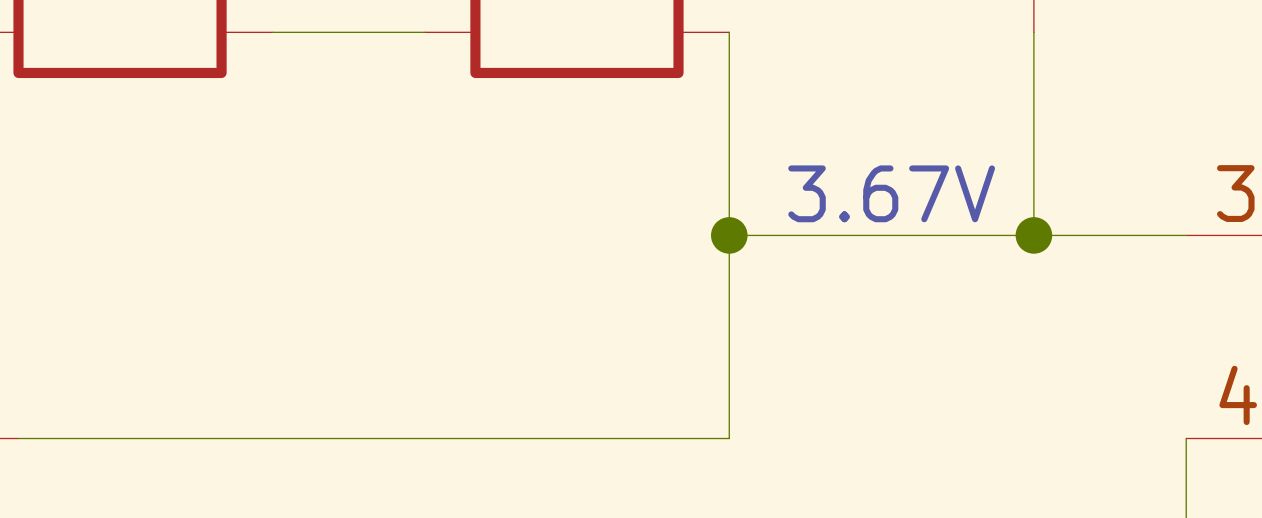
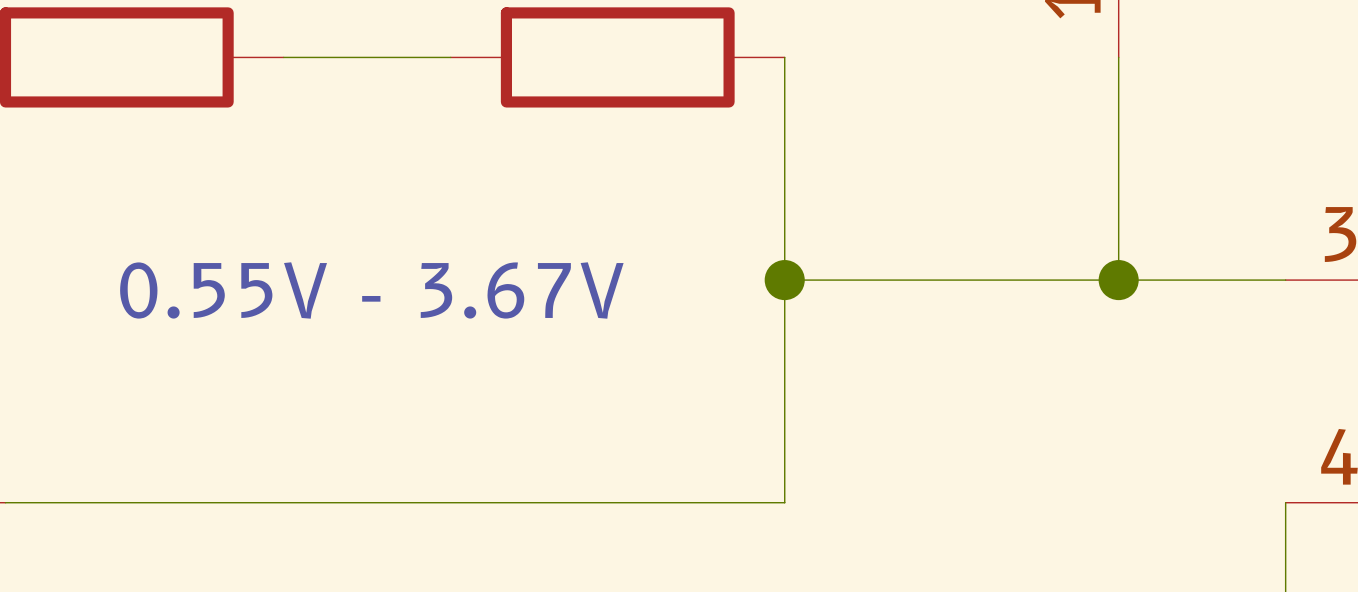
text: 3.67V (891, 193) -> none
text: none -> 0.55V - 3.67V (371, 290)

